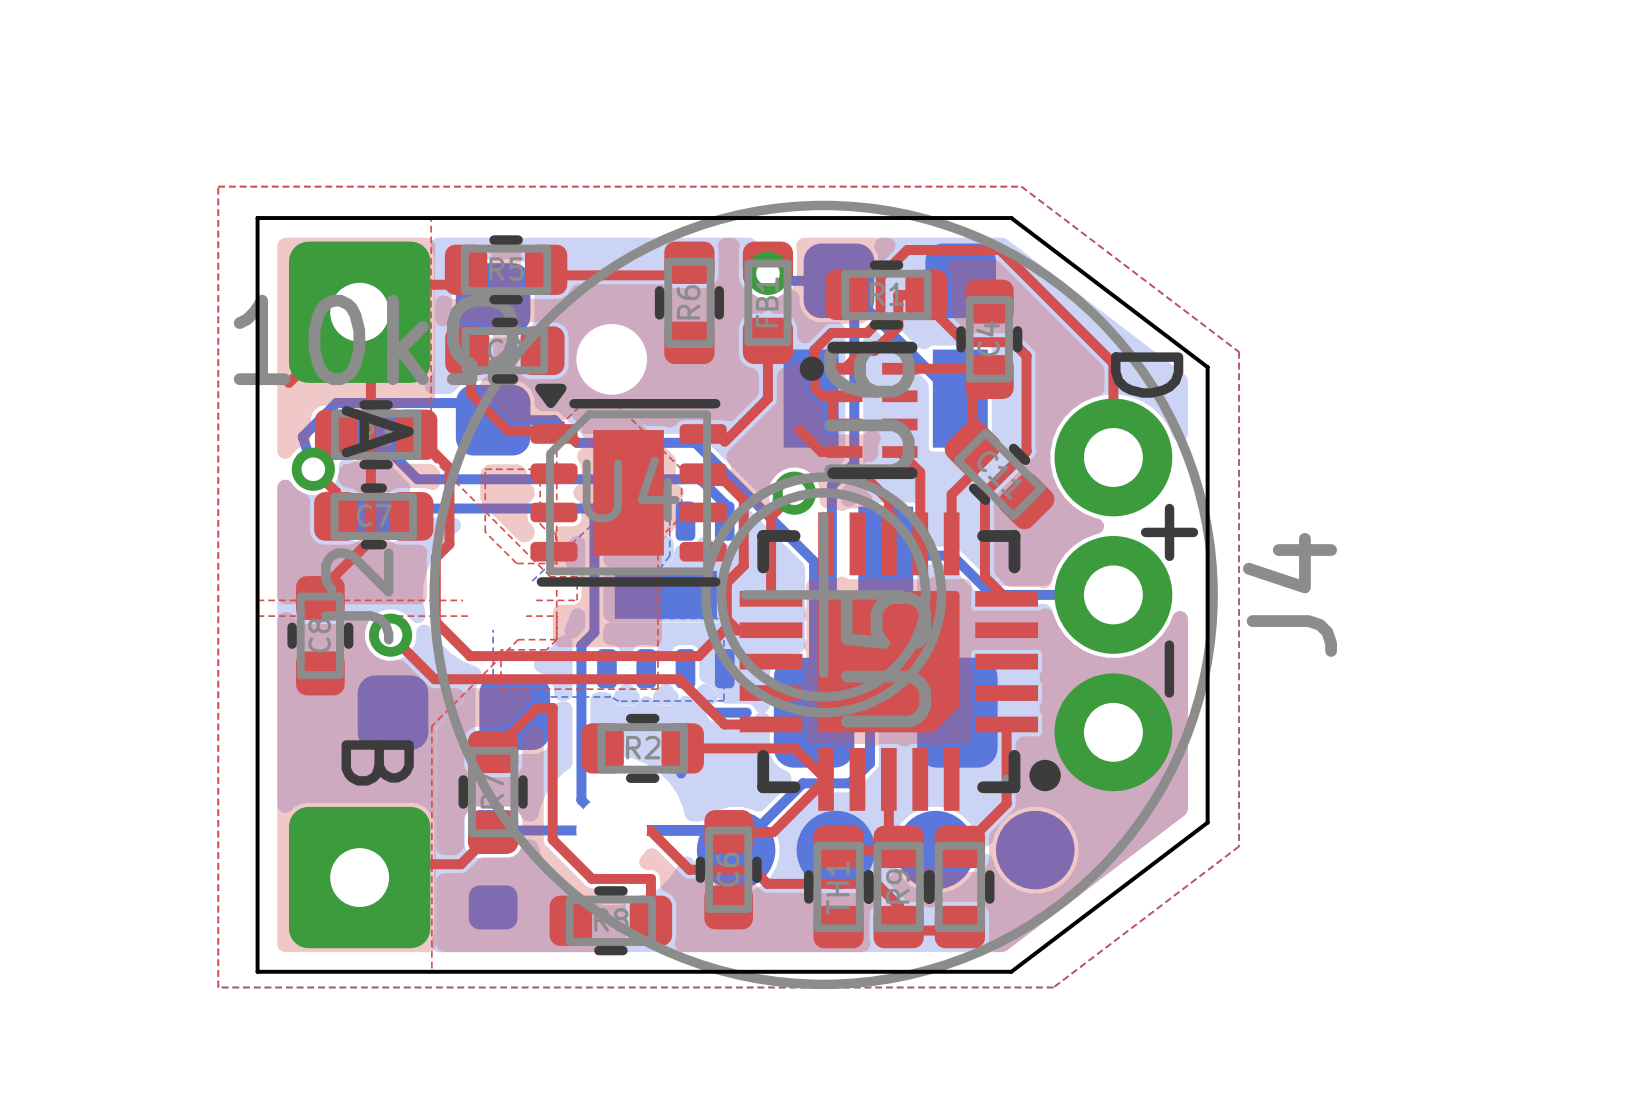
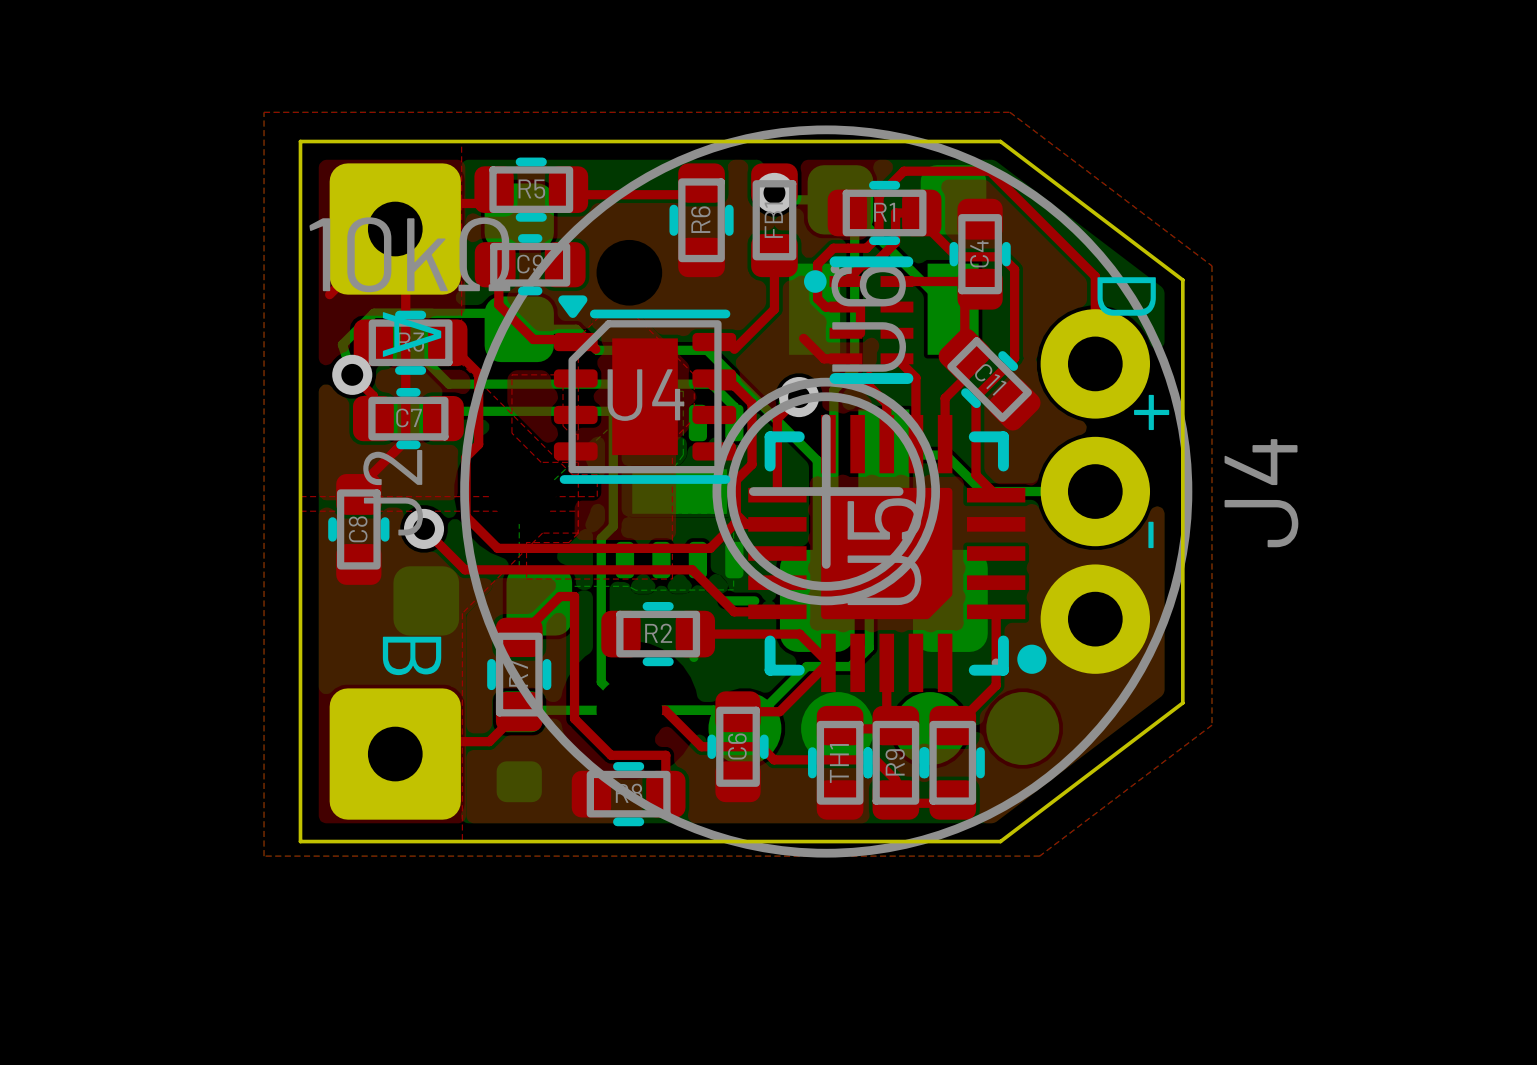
top track: (833, 396) (833, 424) -> (860, 307) (860, 333)

